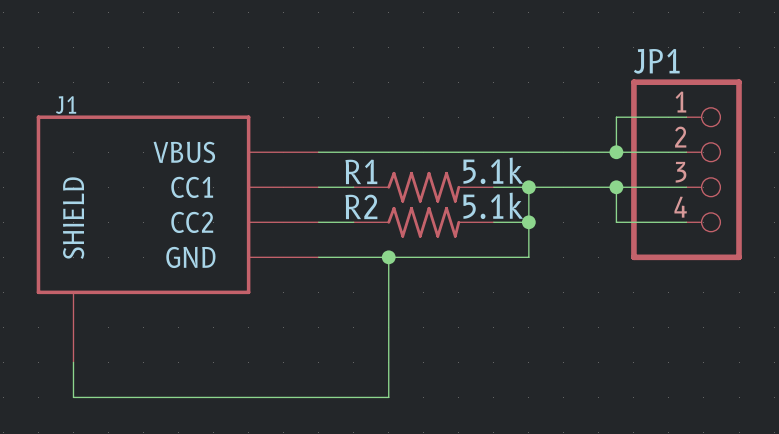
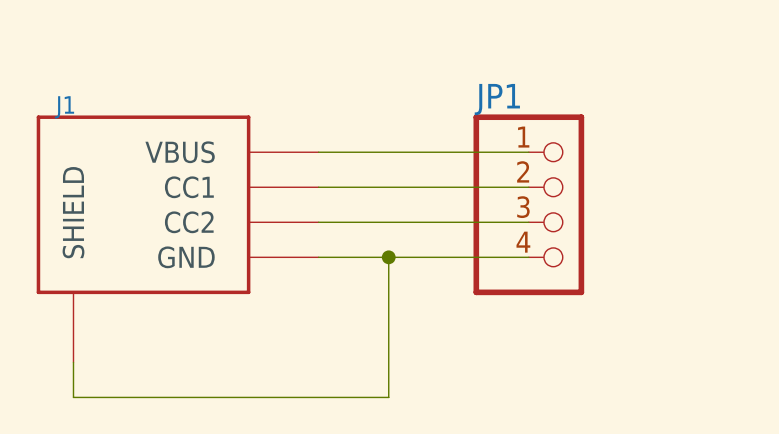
wire: (686, 117) (616, 117) (616, 152) -> none
wire: (528, 152) (686, 152) -> none
junction: (616, 152) -> none
JP1 position: (686, 169) -> (528, 204)
R1: 5.1k (423, 187) -> none
junction: (528, 187) -> none
wire: (616, 187) (616, 222) (686, 222) -> none
junction: (616, 187) -> none
wire: (686, 187) (528, 187) (528, 257) -> none
R2: 5.1k (423, 222) -> none
junction: (528, 222) -> none

